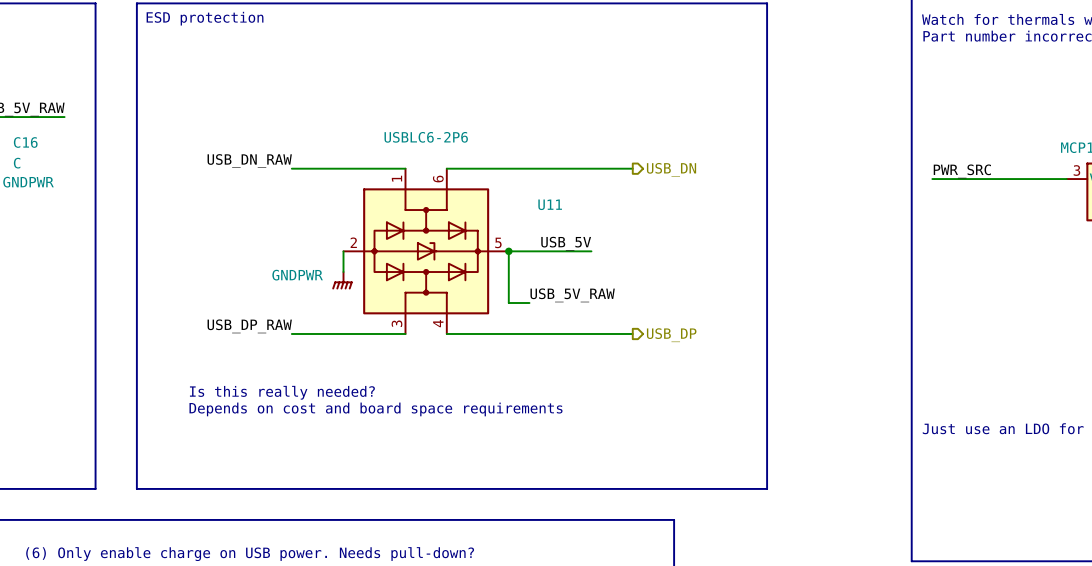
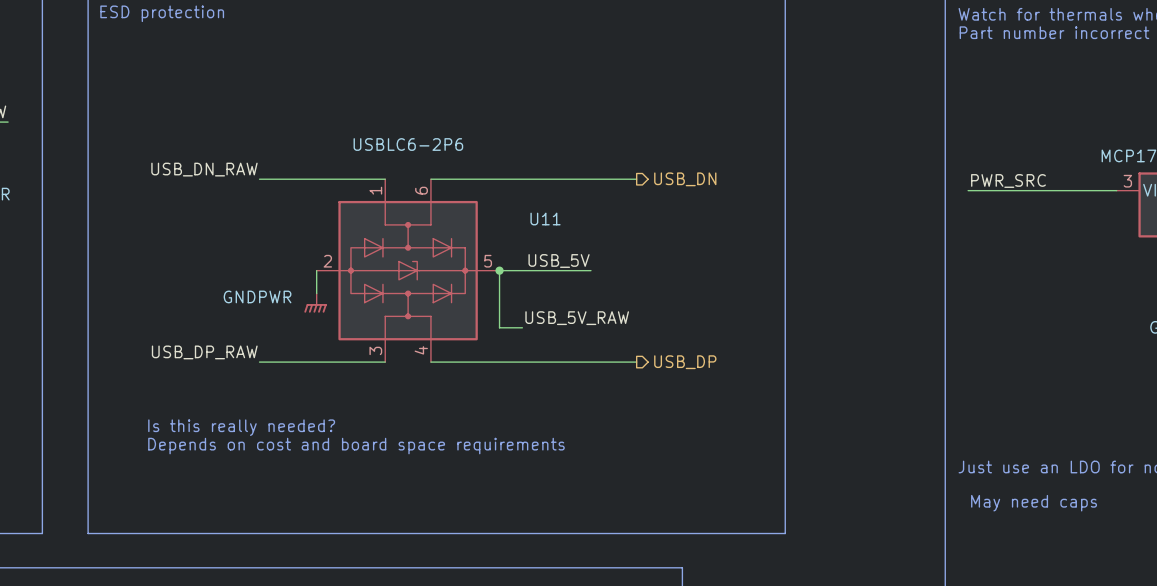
text: none -> May need caps (1034, 503)

